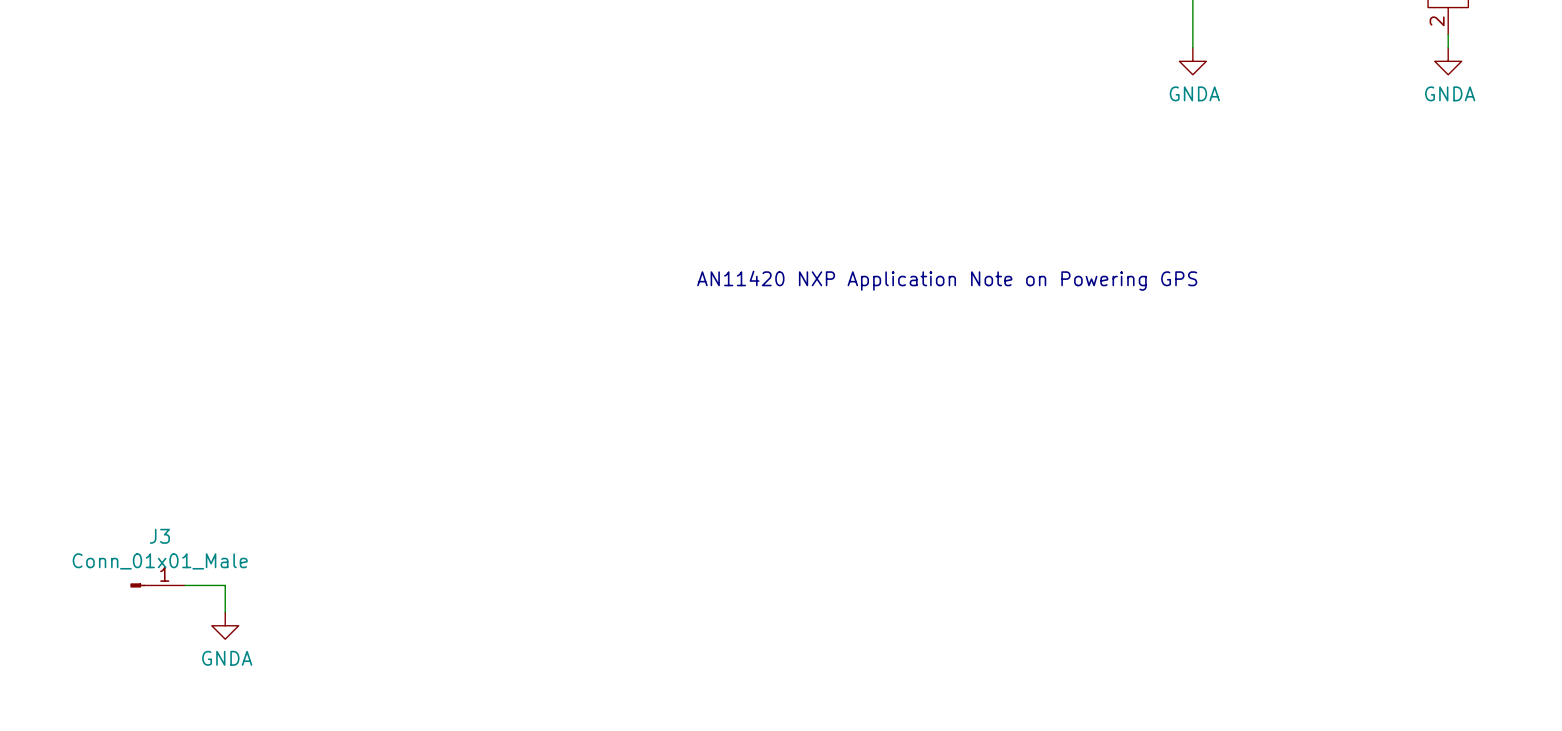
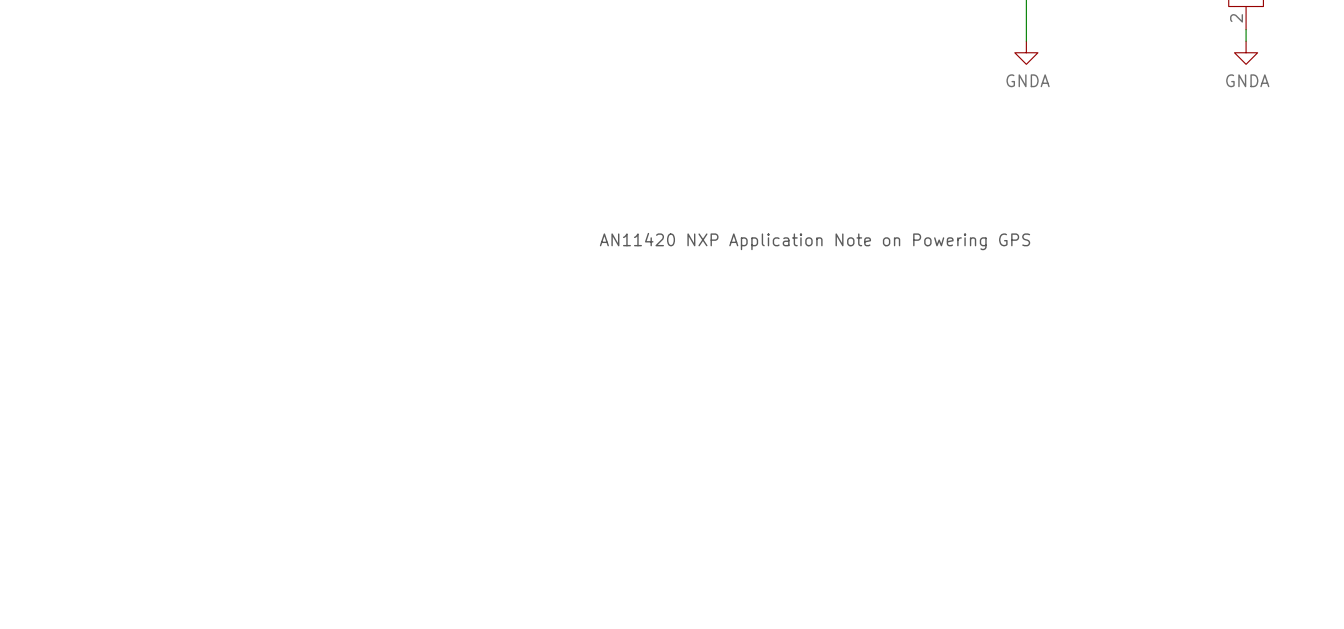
J3: Conn_01x01_Male (157, 585) -> none
wire: (184, 585) (225, 585) (225, 612) -> none
power symbol: GNDA (225, 625) -> none

